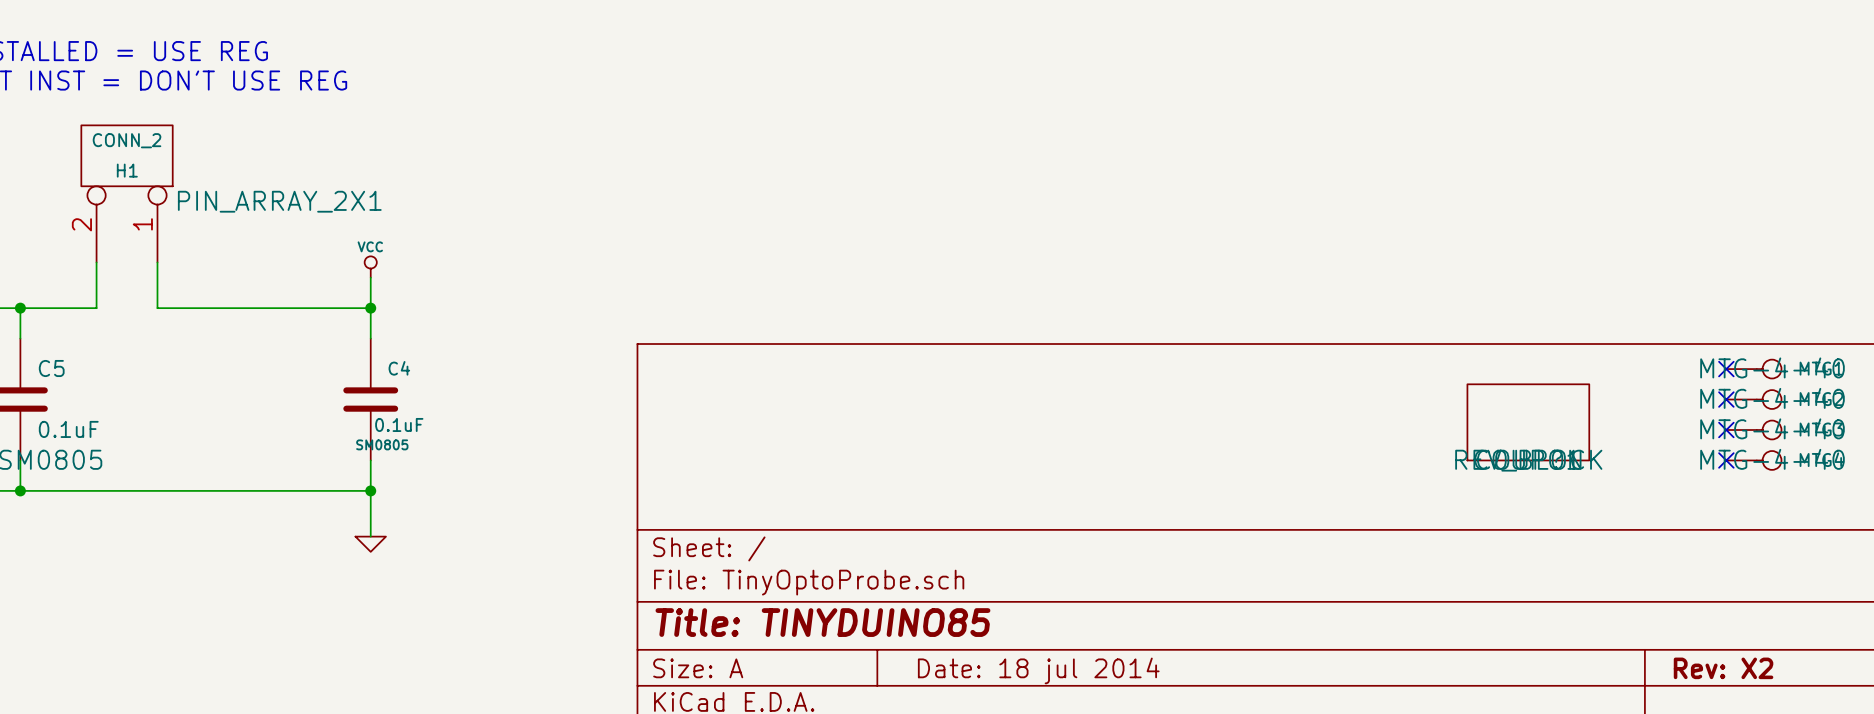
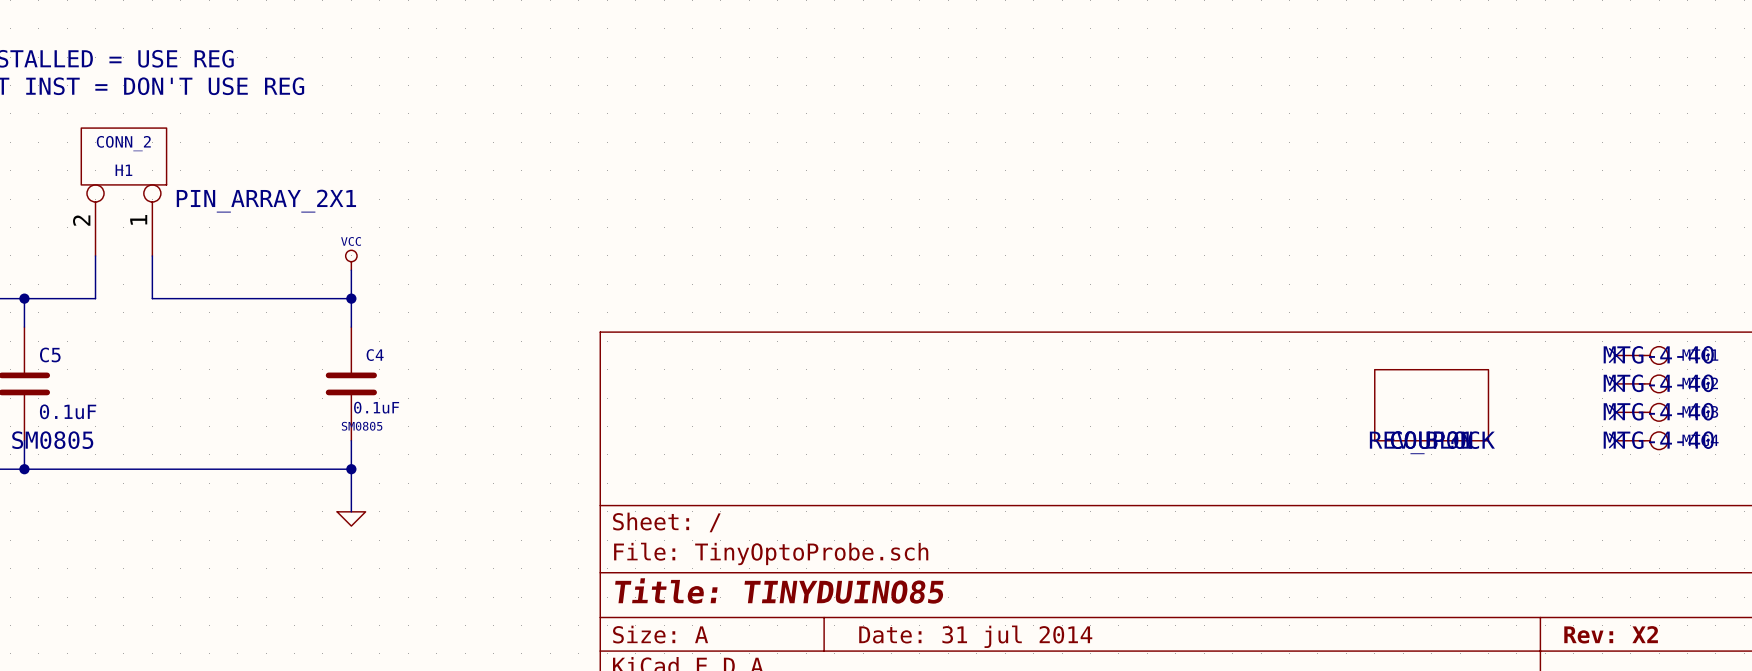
title block: Date: 18 jul 2014 (1038, 670) -> Date: 31 jul 2014 (975, 636)

